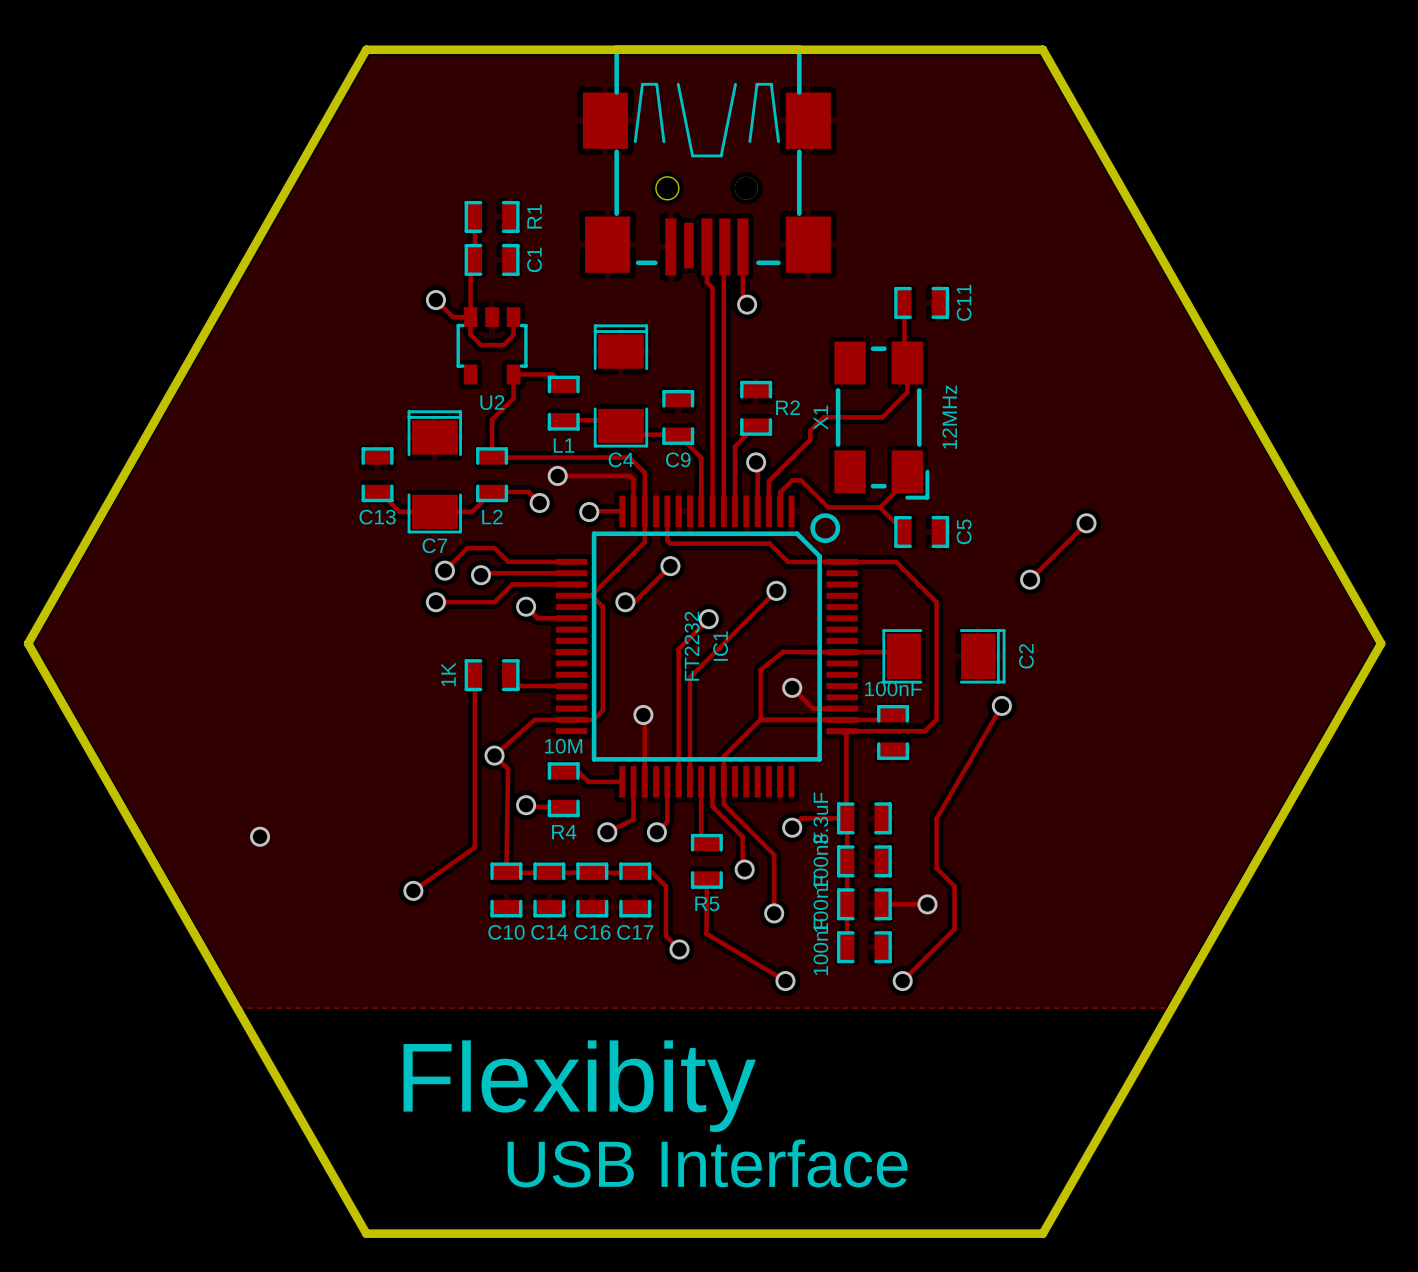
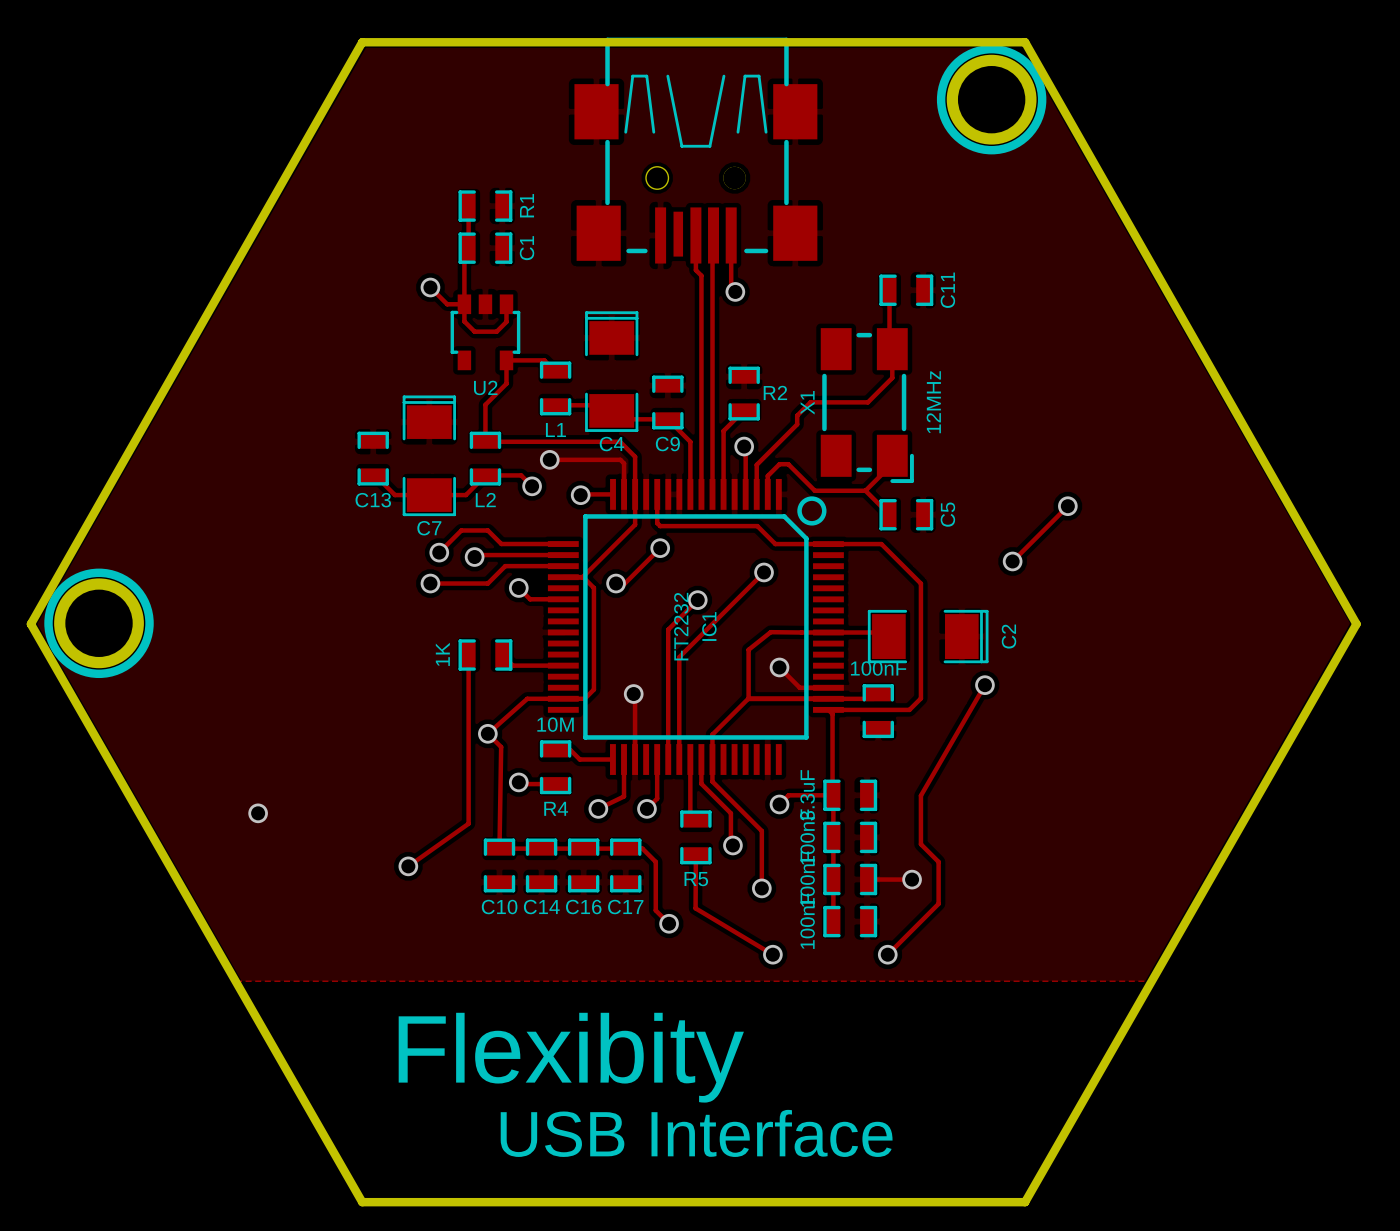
part: none -> (991, 99)
part: none -> (99, 623)

